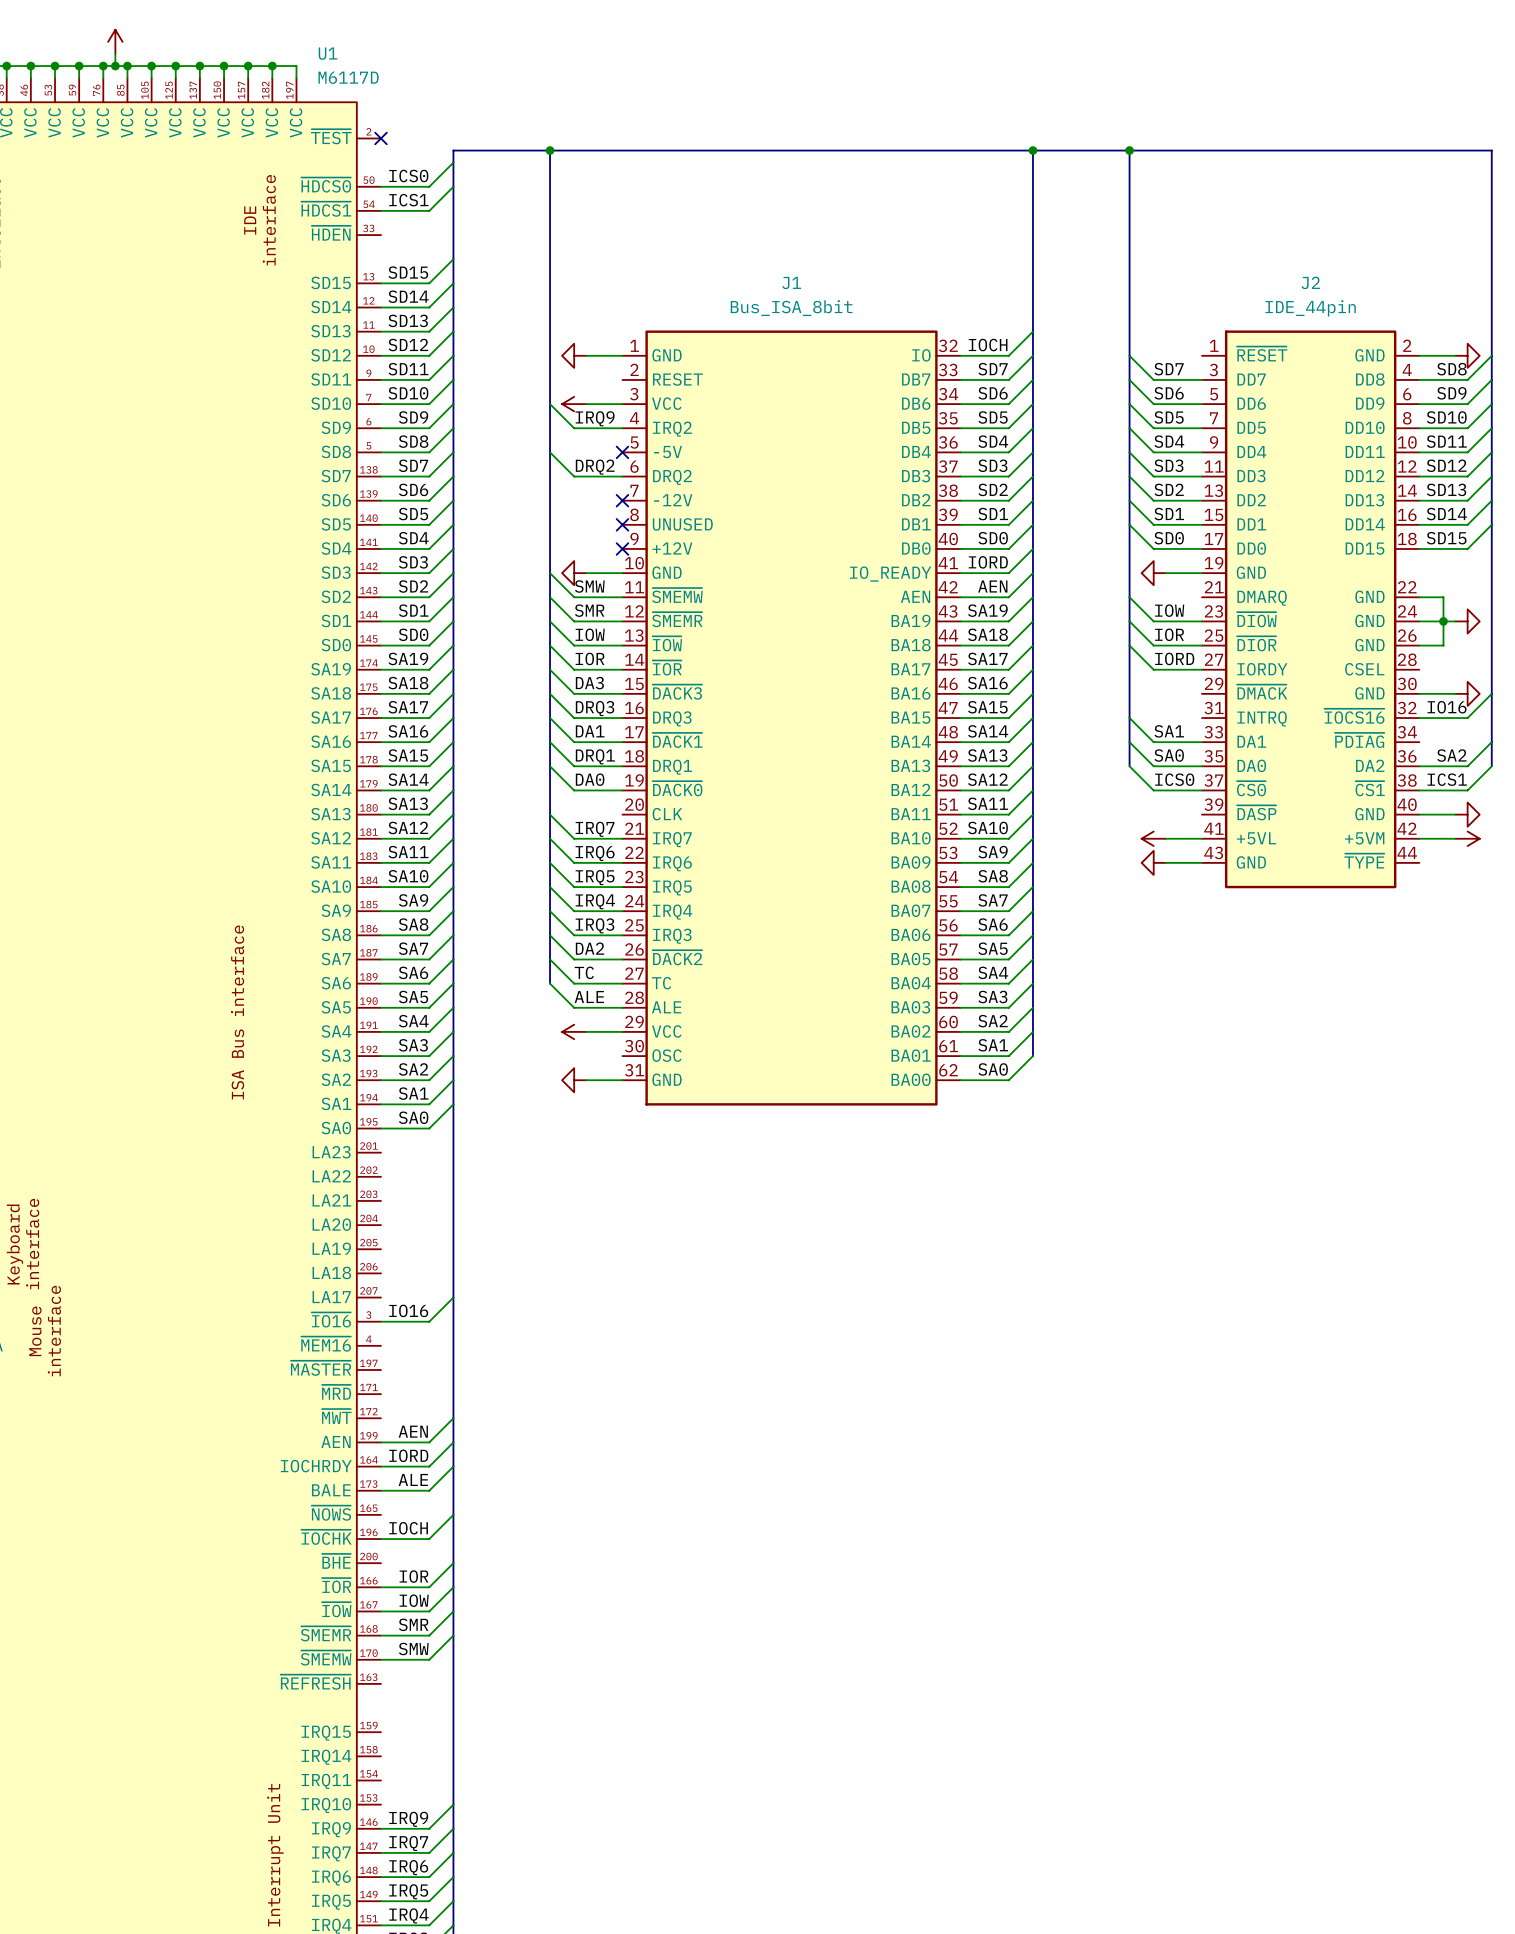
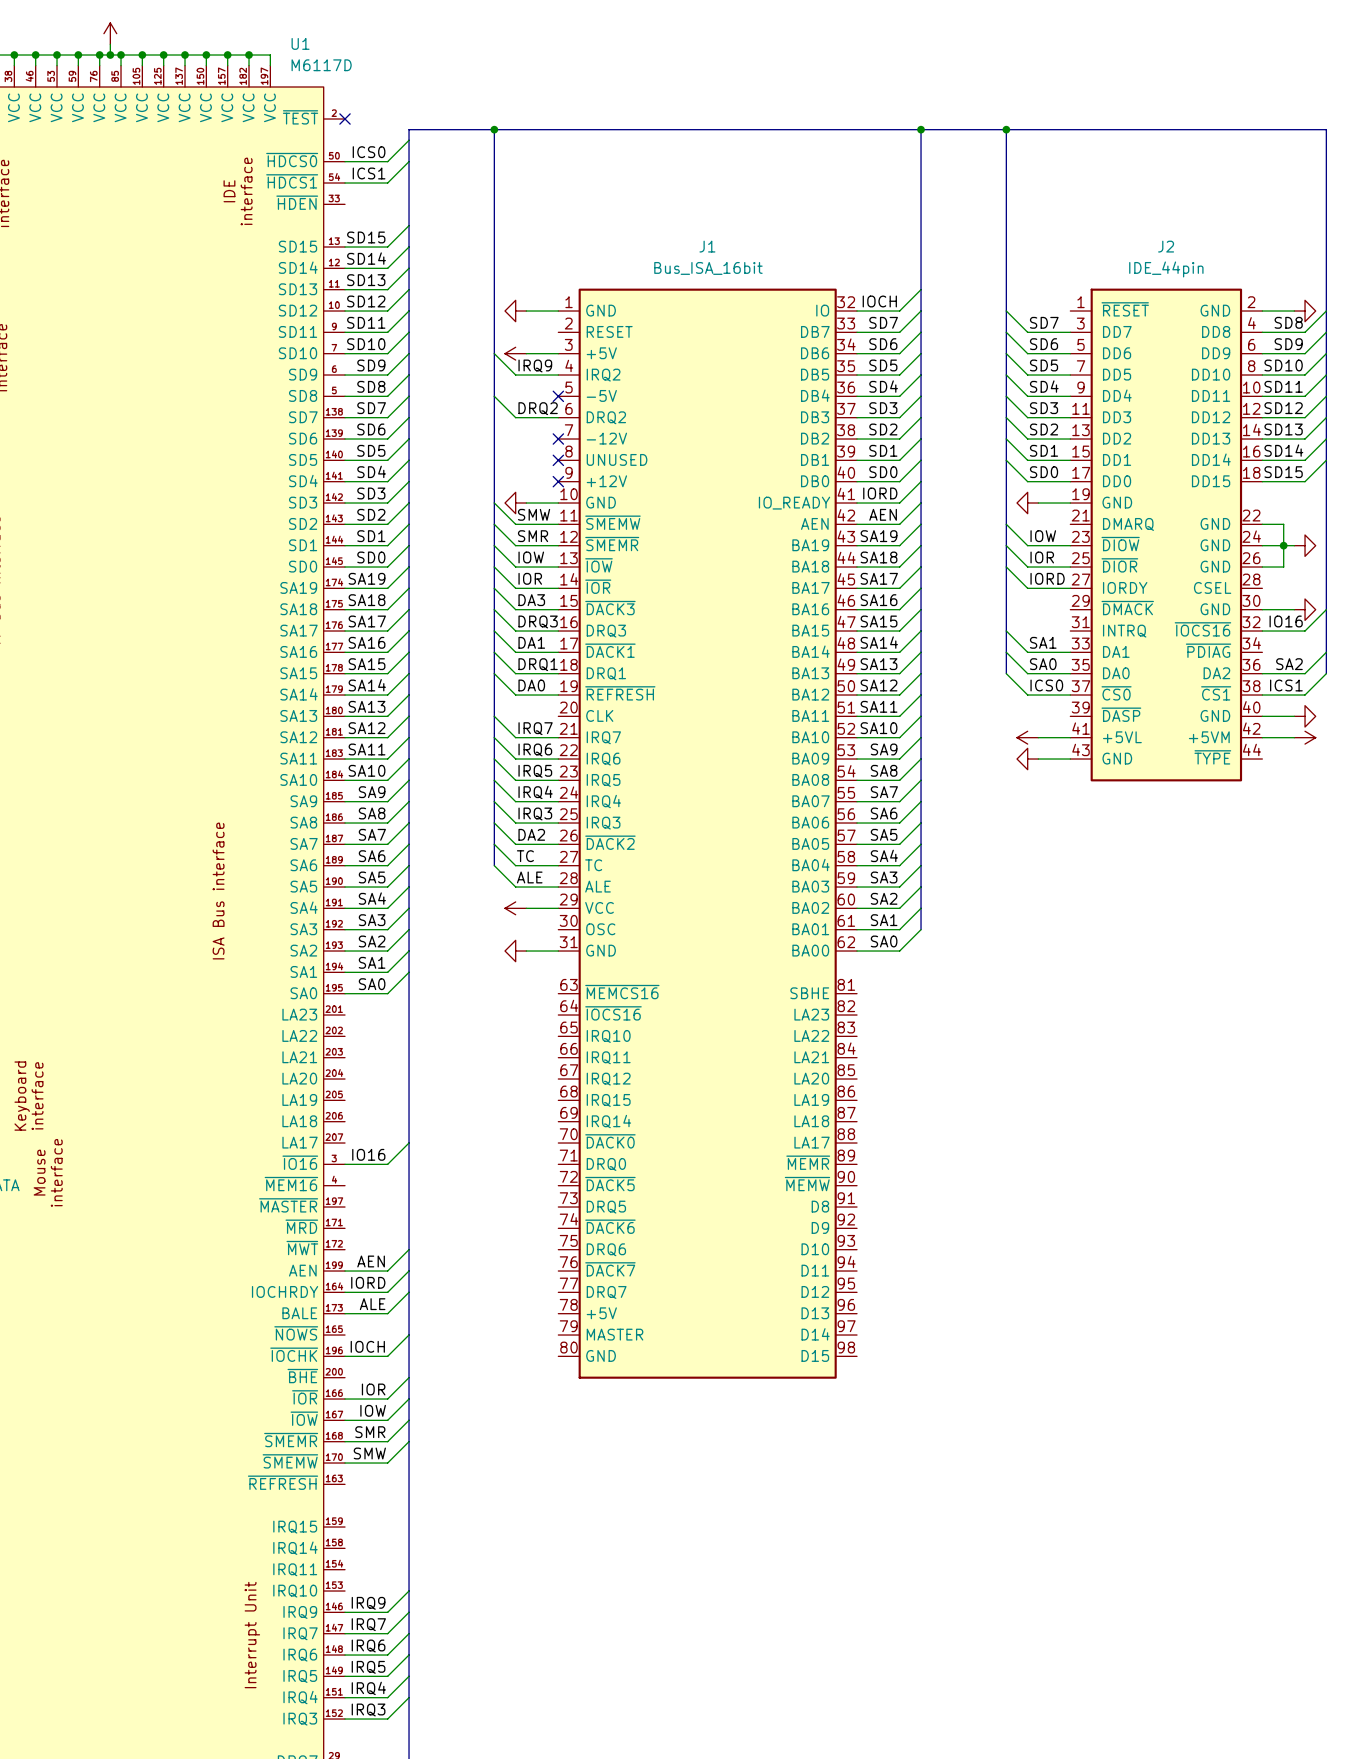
J1 value: Bus_ISA_8bit (791, 308) -> Bus_ISA_16bit (708, 268)
J1 symbol: [622, 330, 961, 1106] -> [558, 288, 858, 1379]

